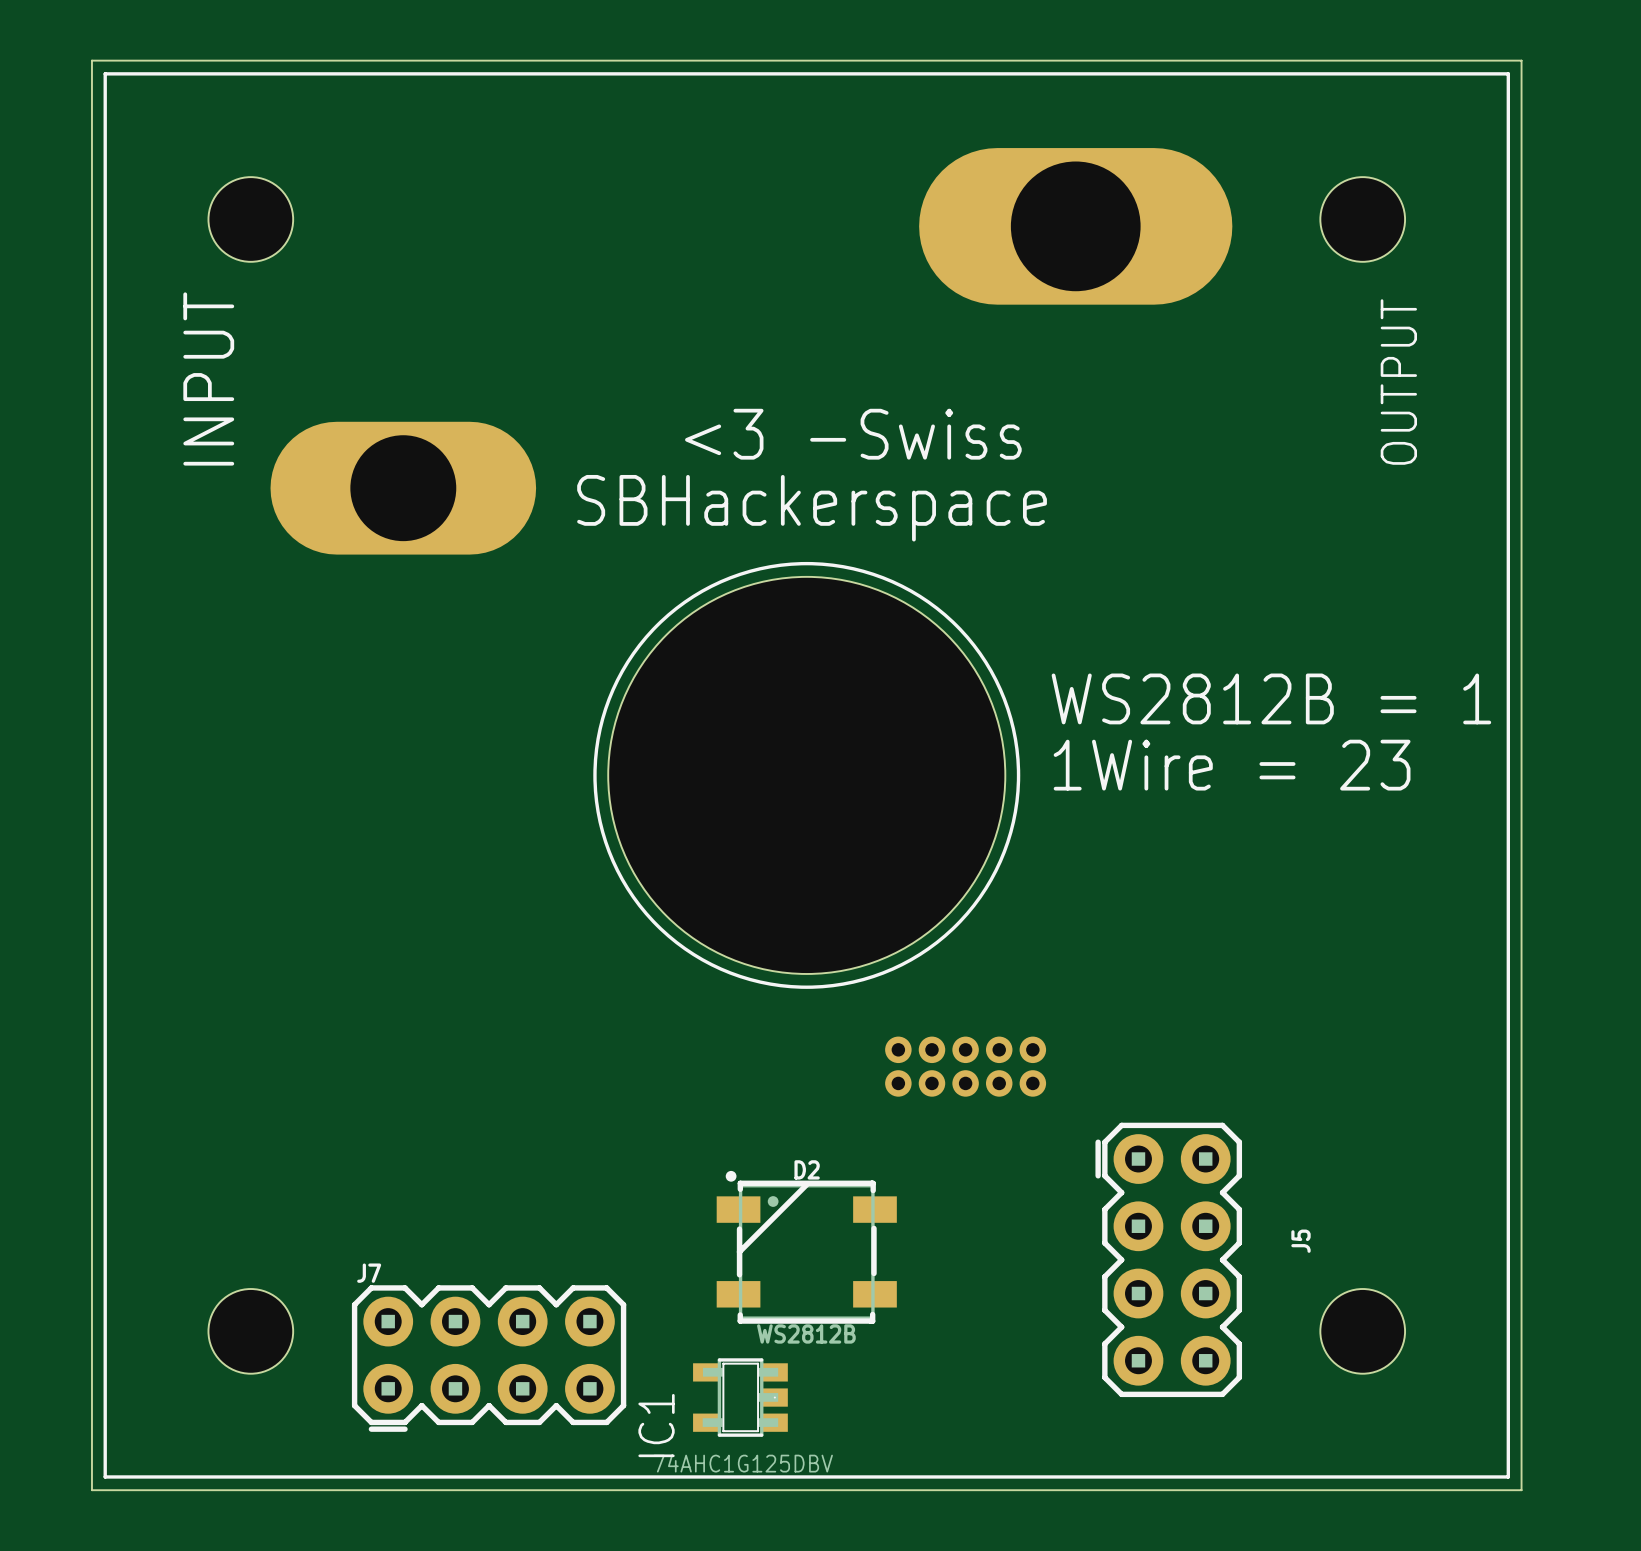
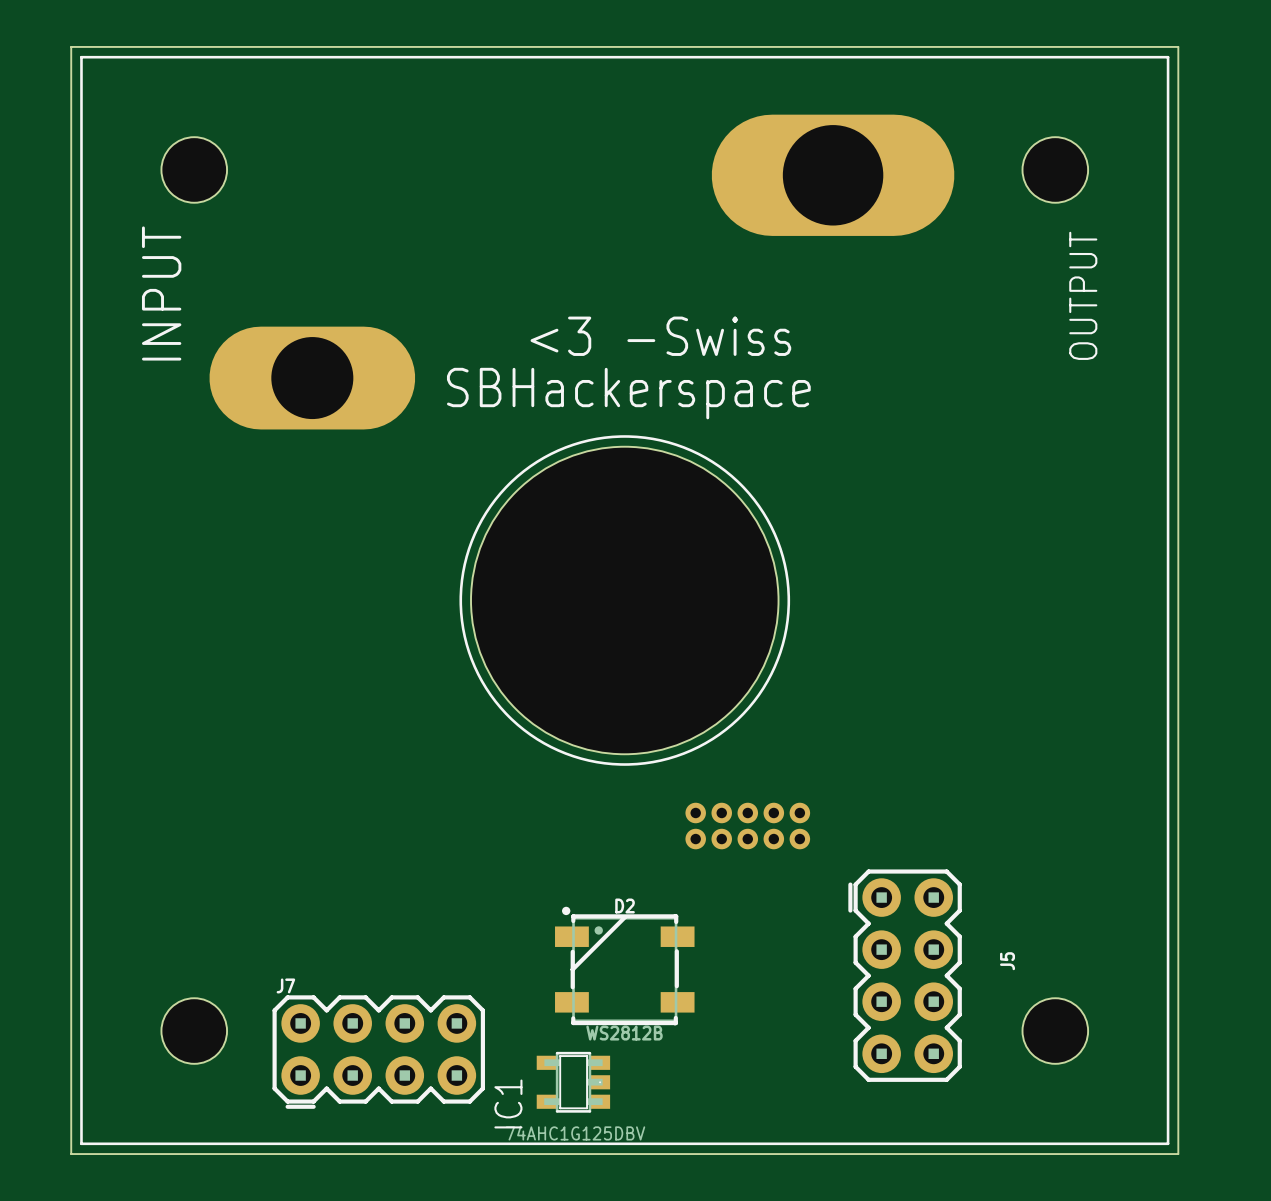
text: WS2812B = 1 (1271, 698) -> none
text: 1Wire = 23 (1232, 765) -> none

